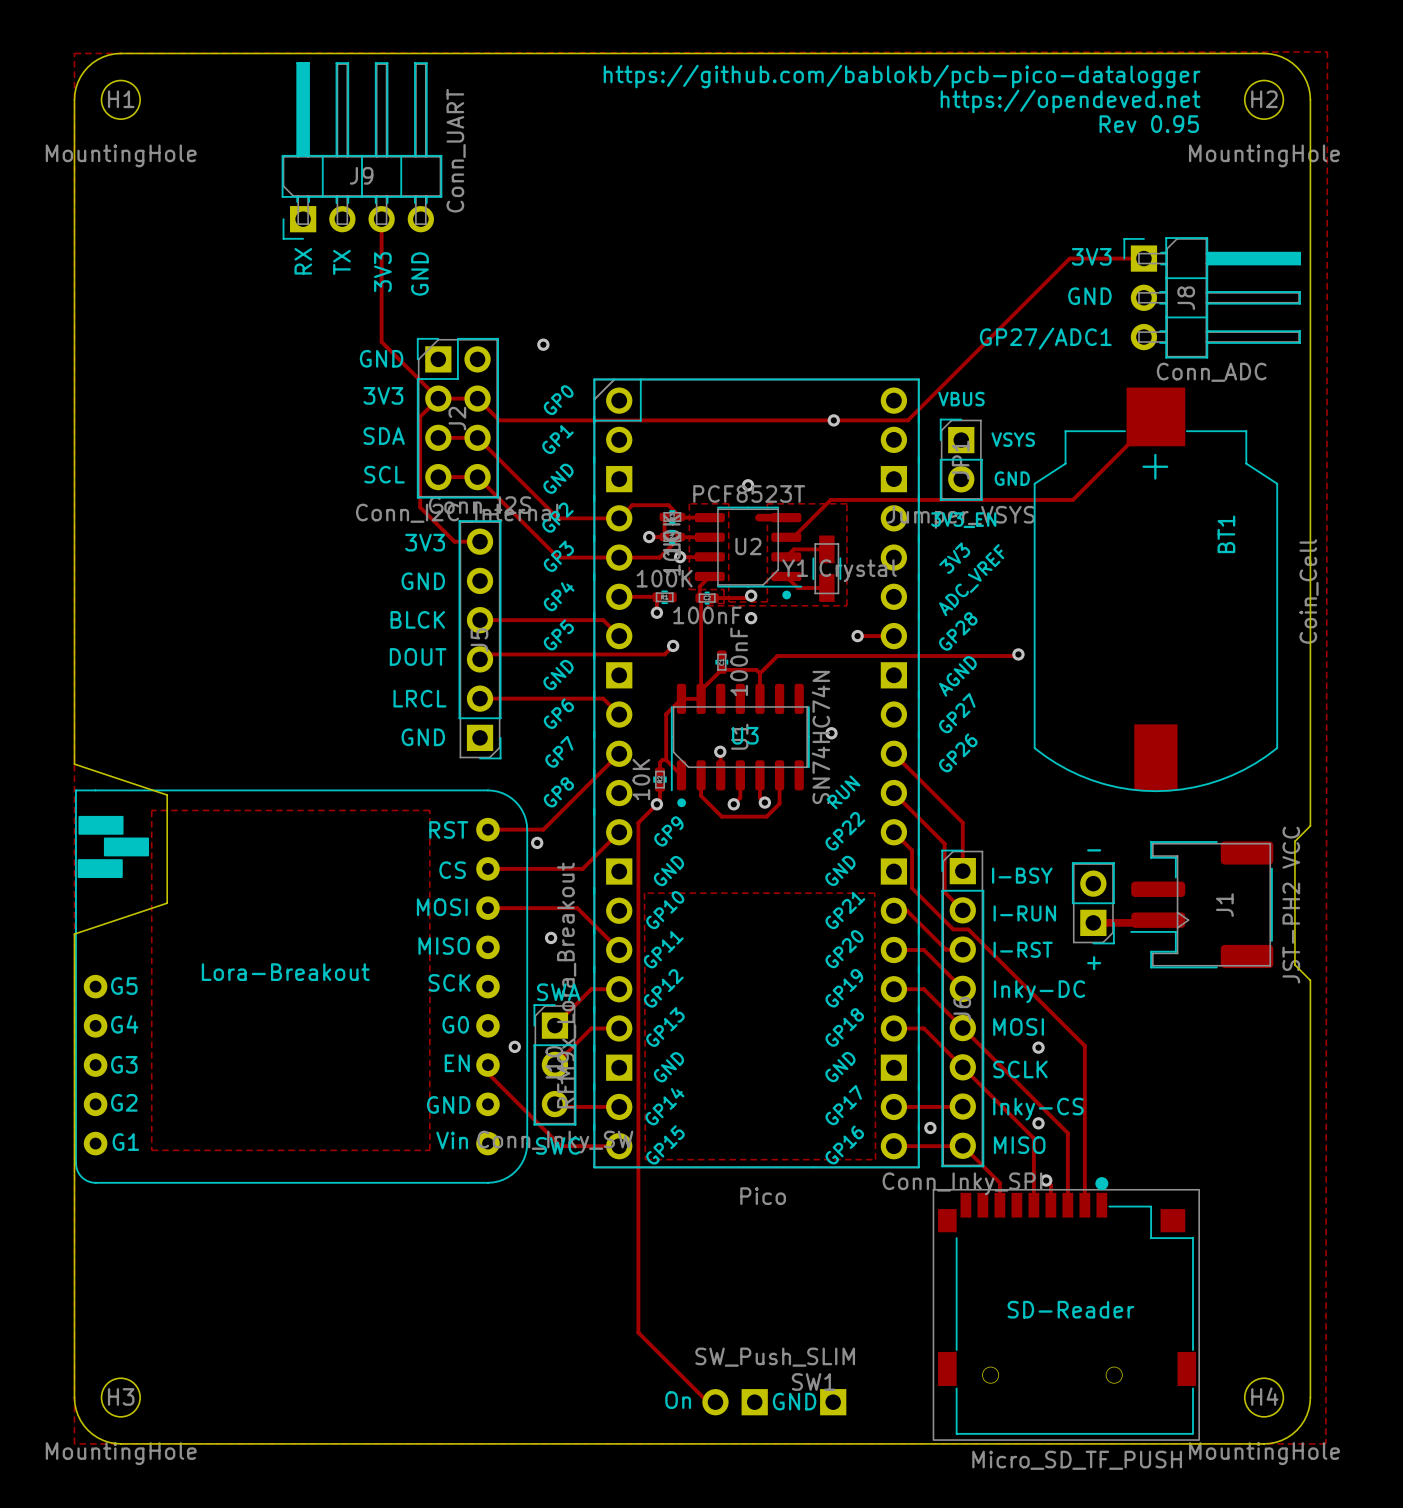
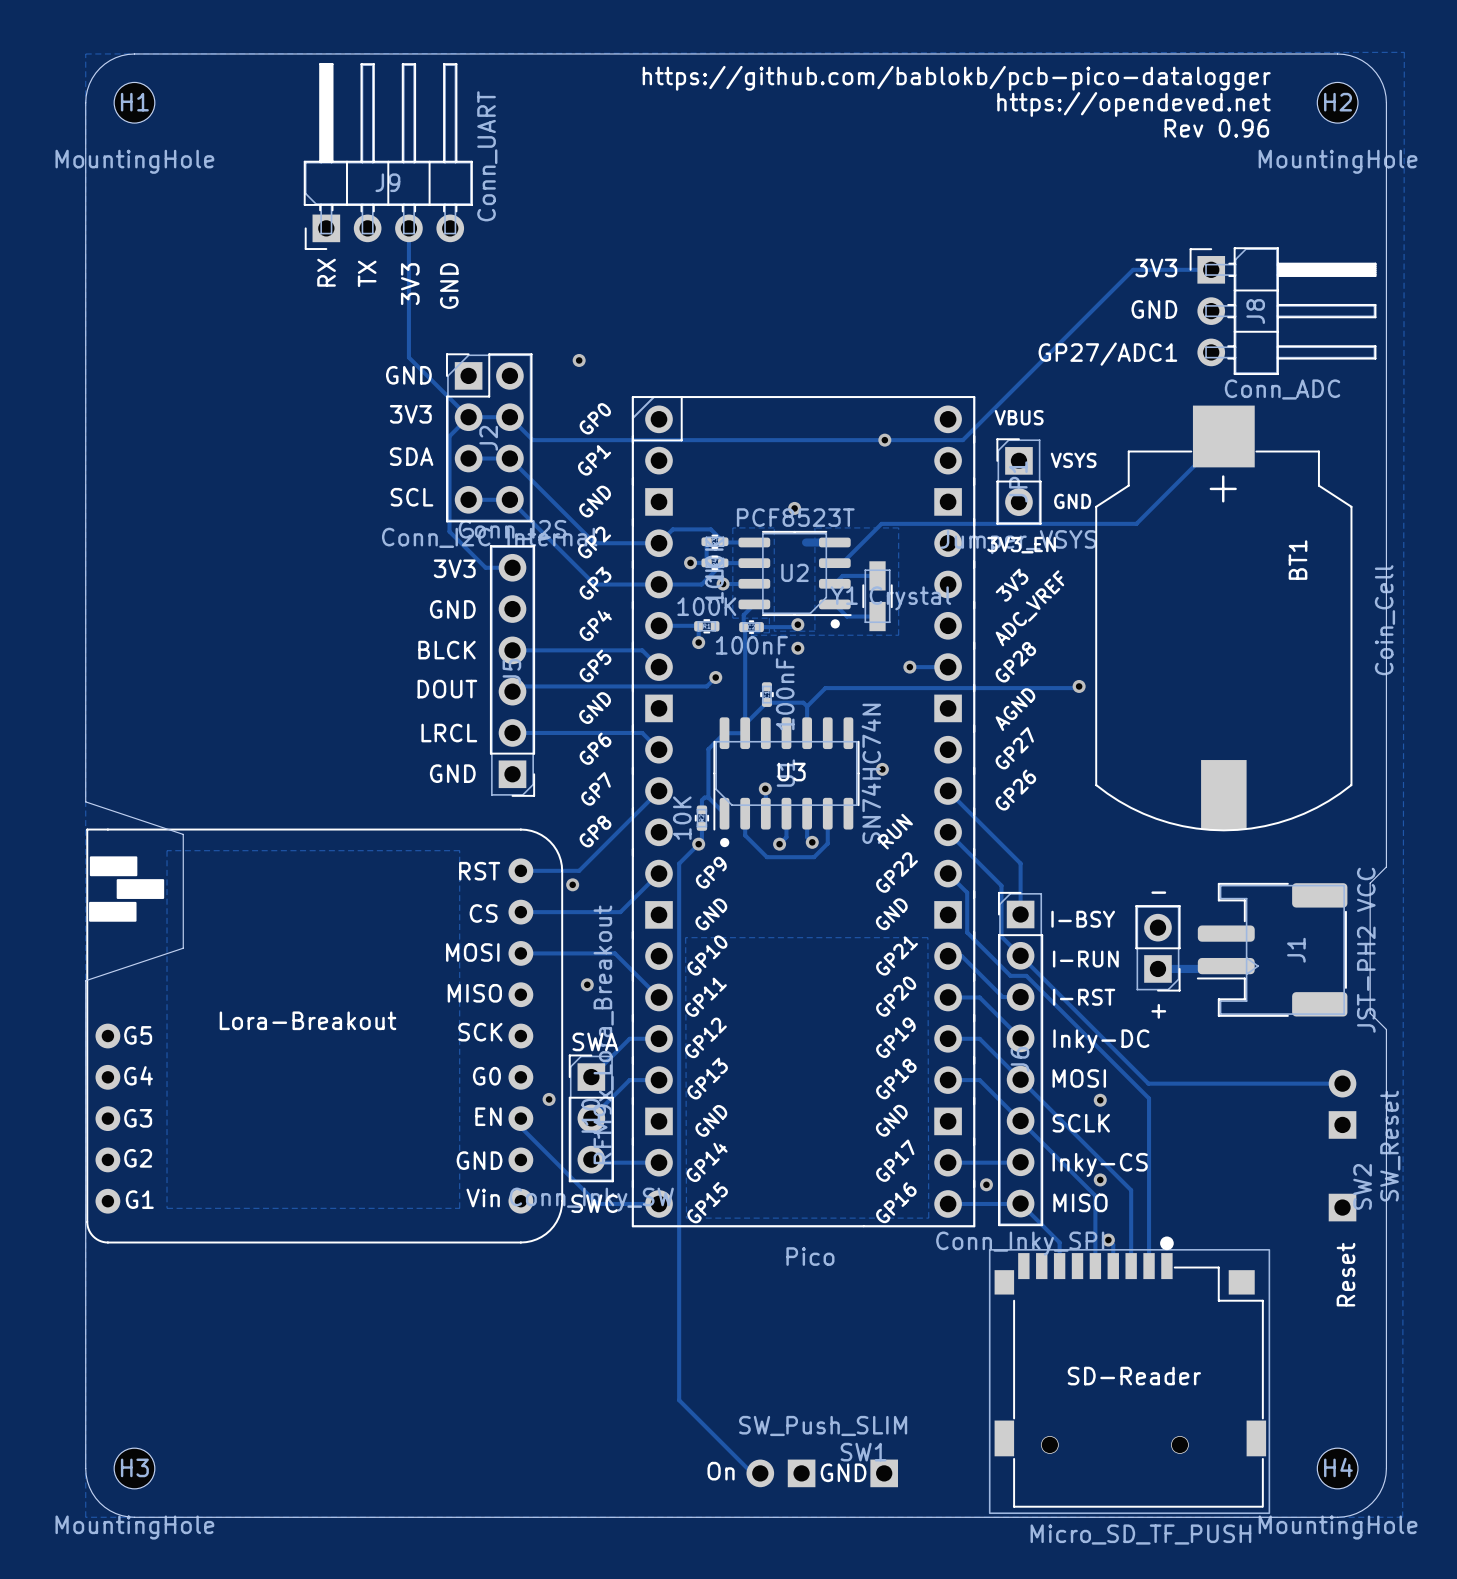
text: Rev 0.95 (1149, 124) -> Rev 0.96 (1216, 128)
track: none -> (1020, 955) (1148, 1083) (1342, 1083)
SW2: none -> SW_Reset (1342, 1145)
text: none -> Reset (1345, 1274)

